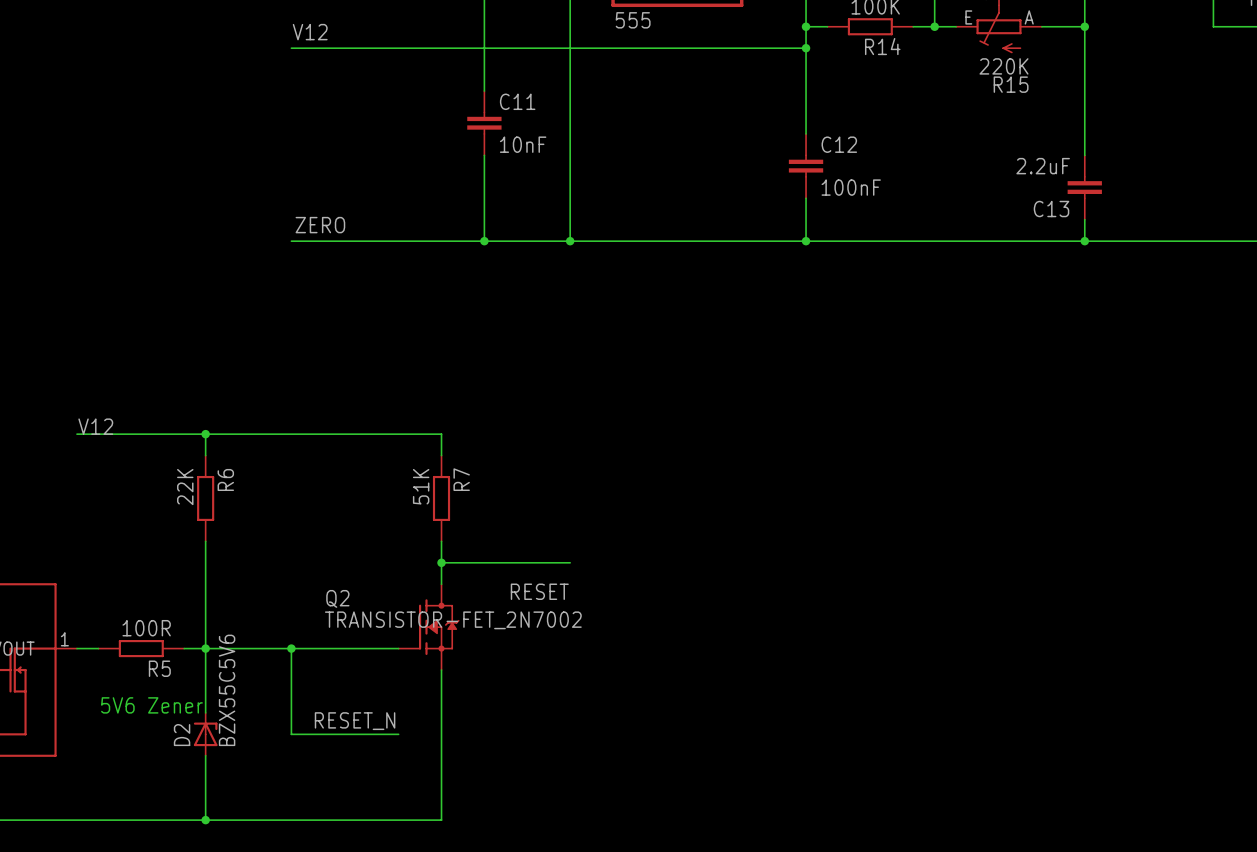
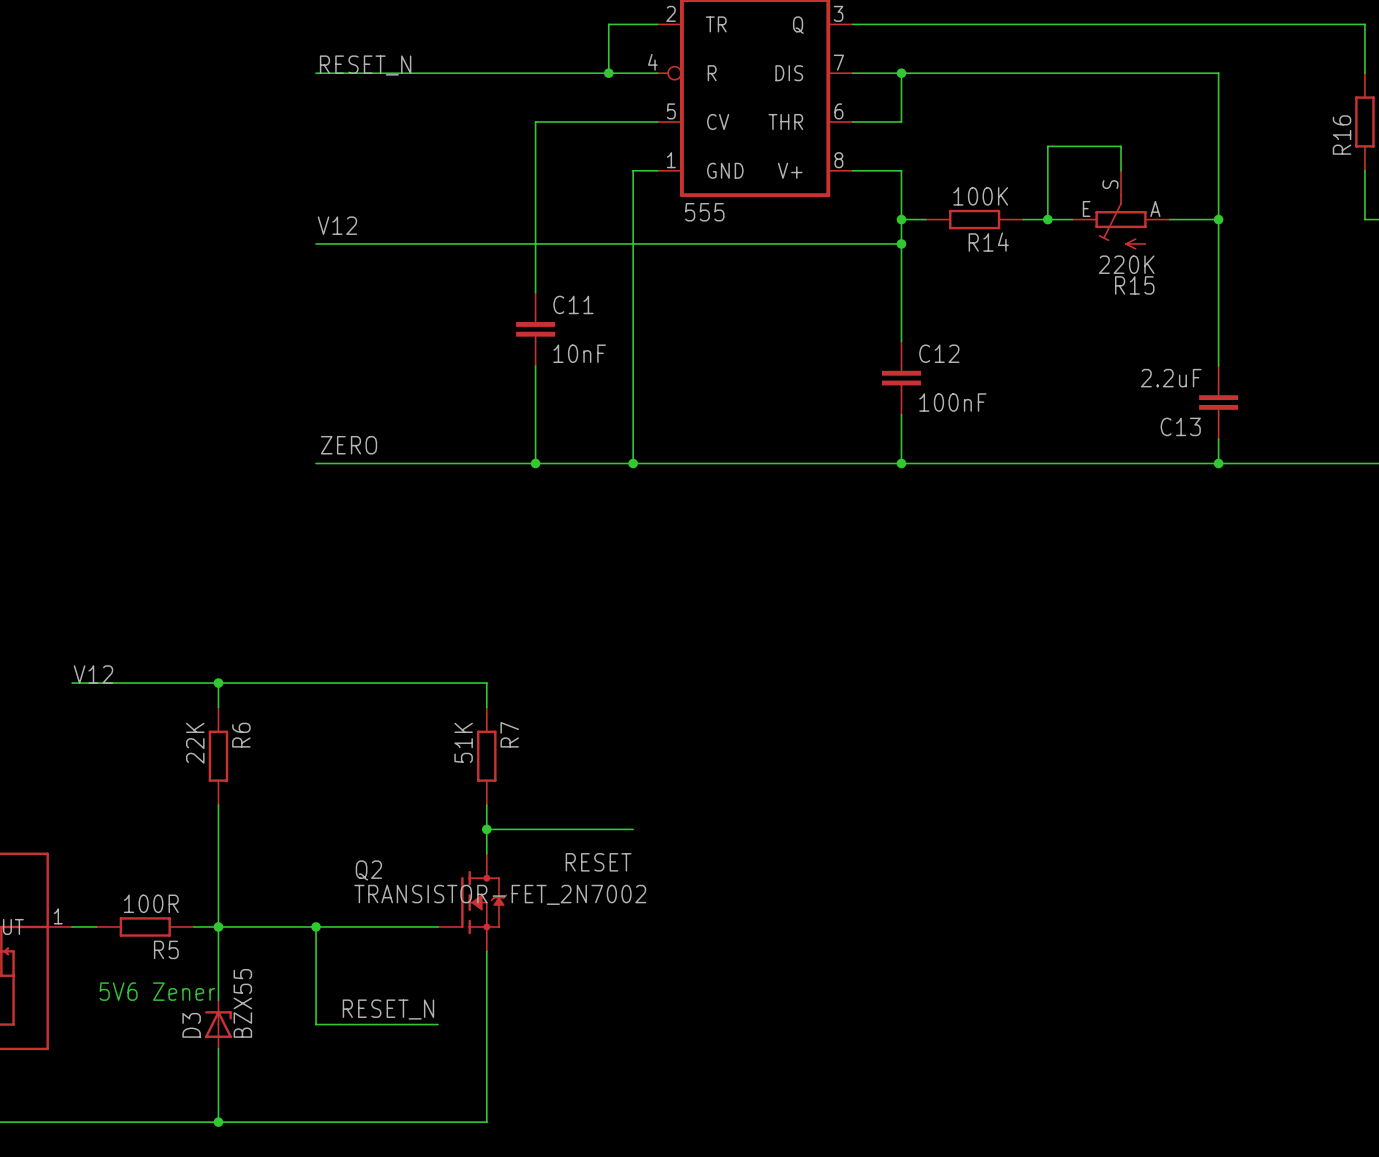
D2 value: BZX55C5V6 (227, 690) -> BZX55 (242, 1003)
D2 name: D2 (182, 735) -> D3 (191, 1025)

